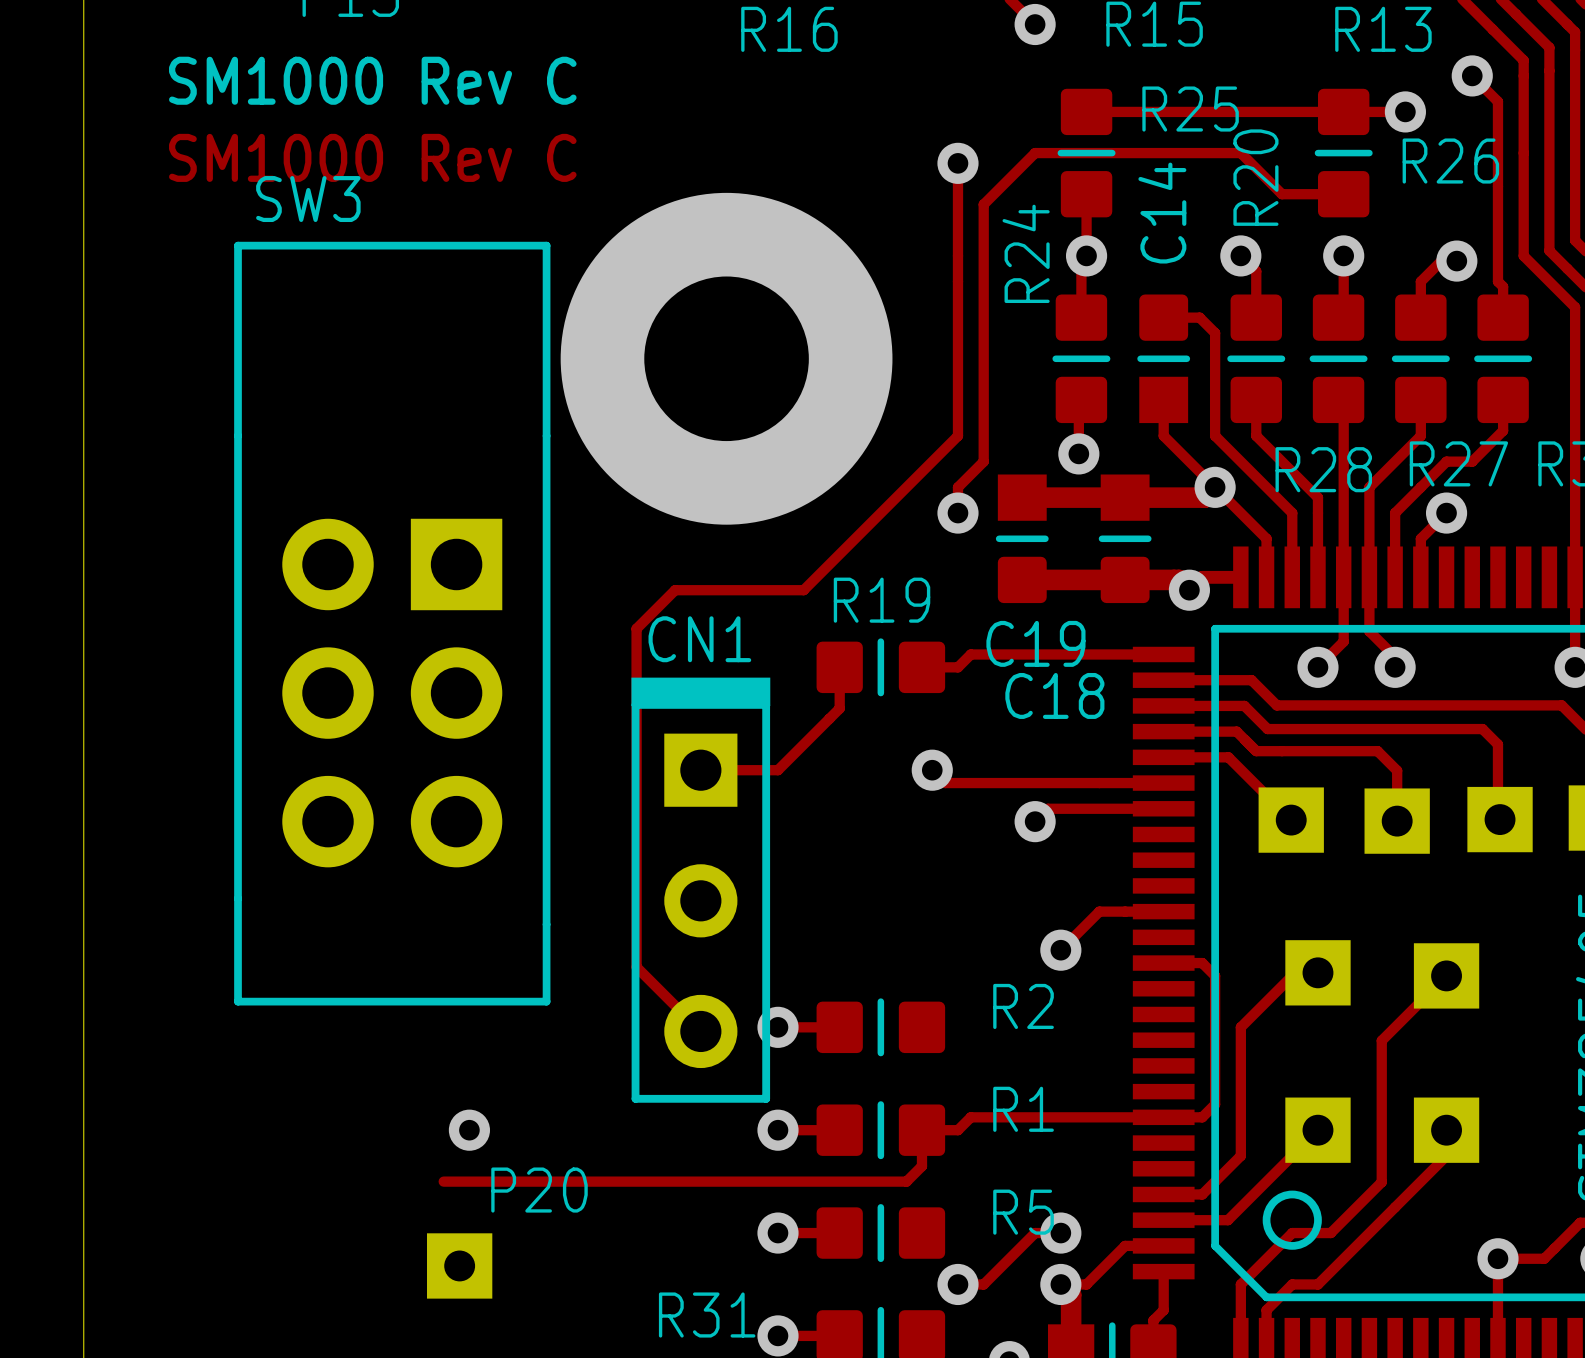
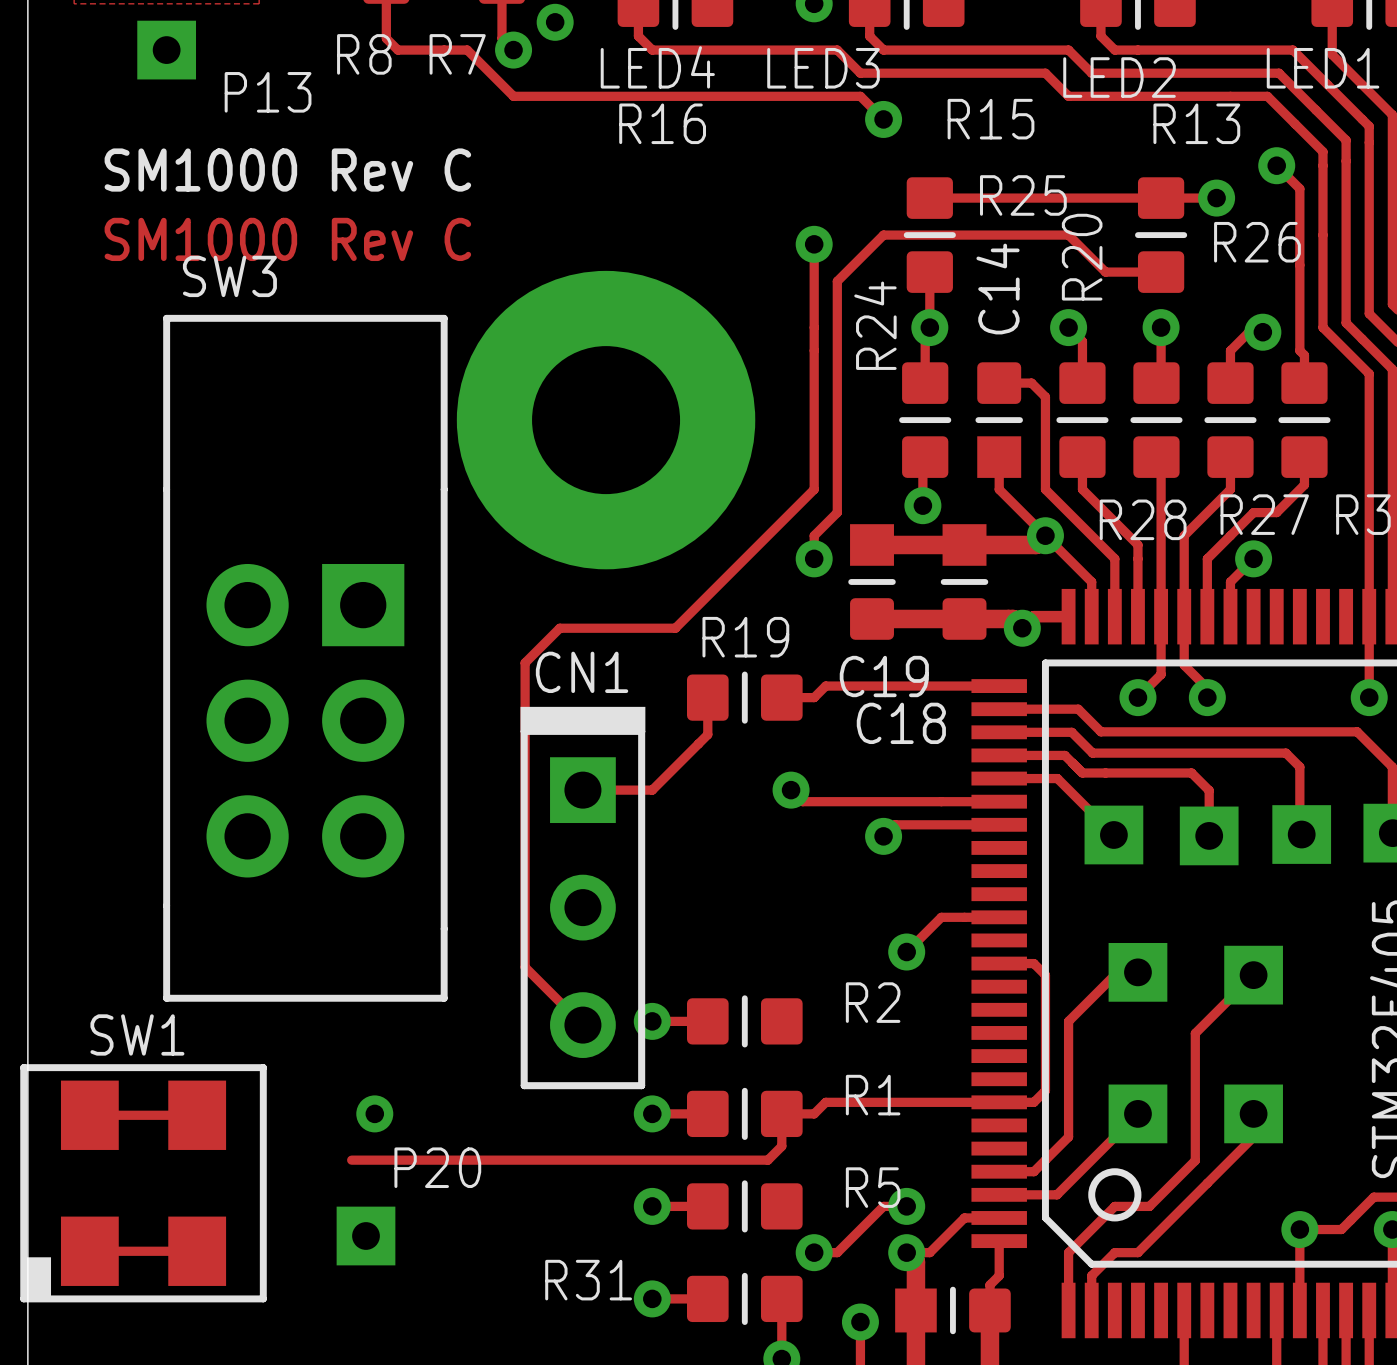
track: none -> (89, 1115) (197, 1115)
SW1: none -> (143, 1183)
track: none -> (89, 1251) (197, 1251)

